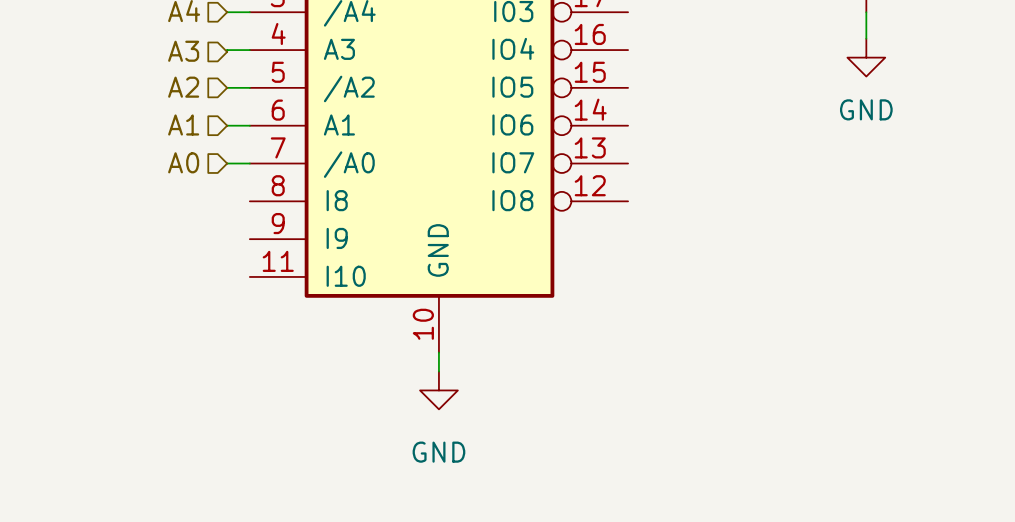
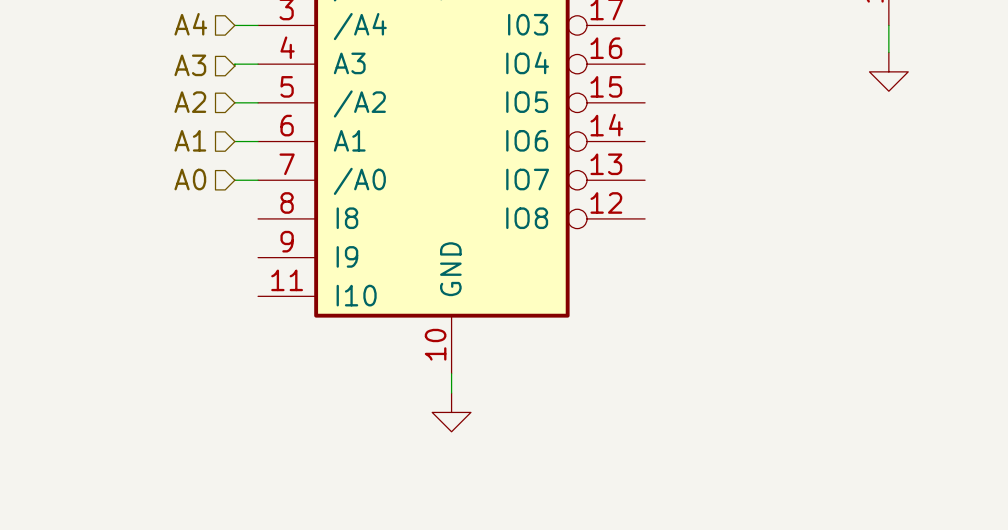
power symbol text: GND (866, 109) -> none
power symbol text: GND (438, 452) -> none

